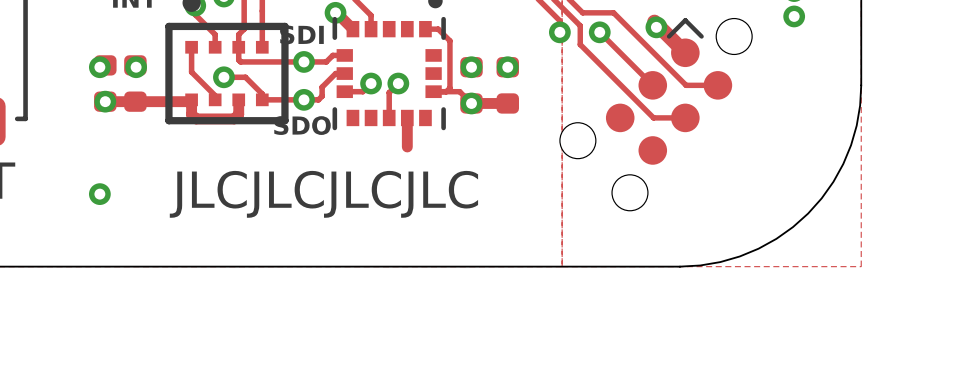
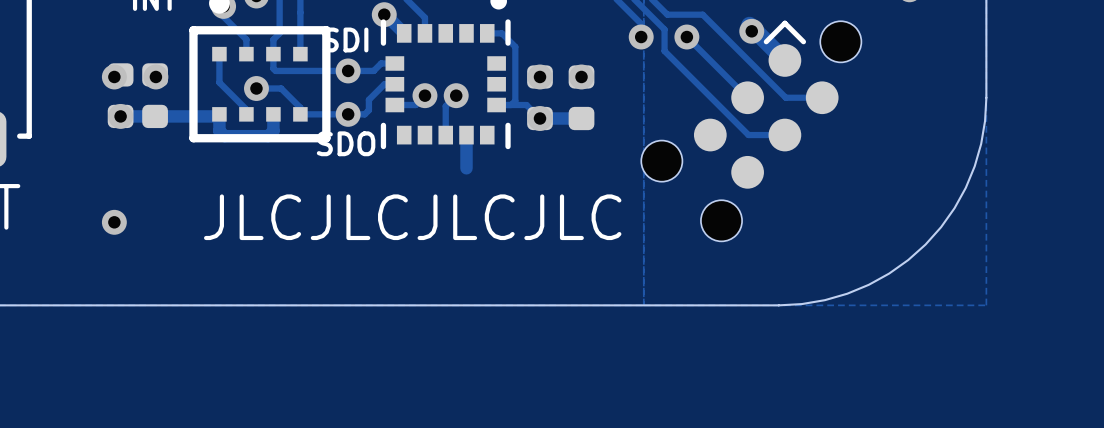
via: (794, 16) -> none

